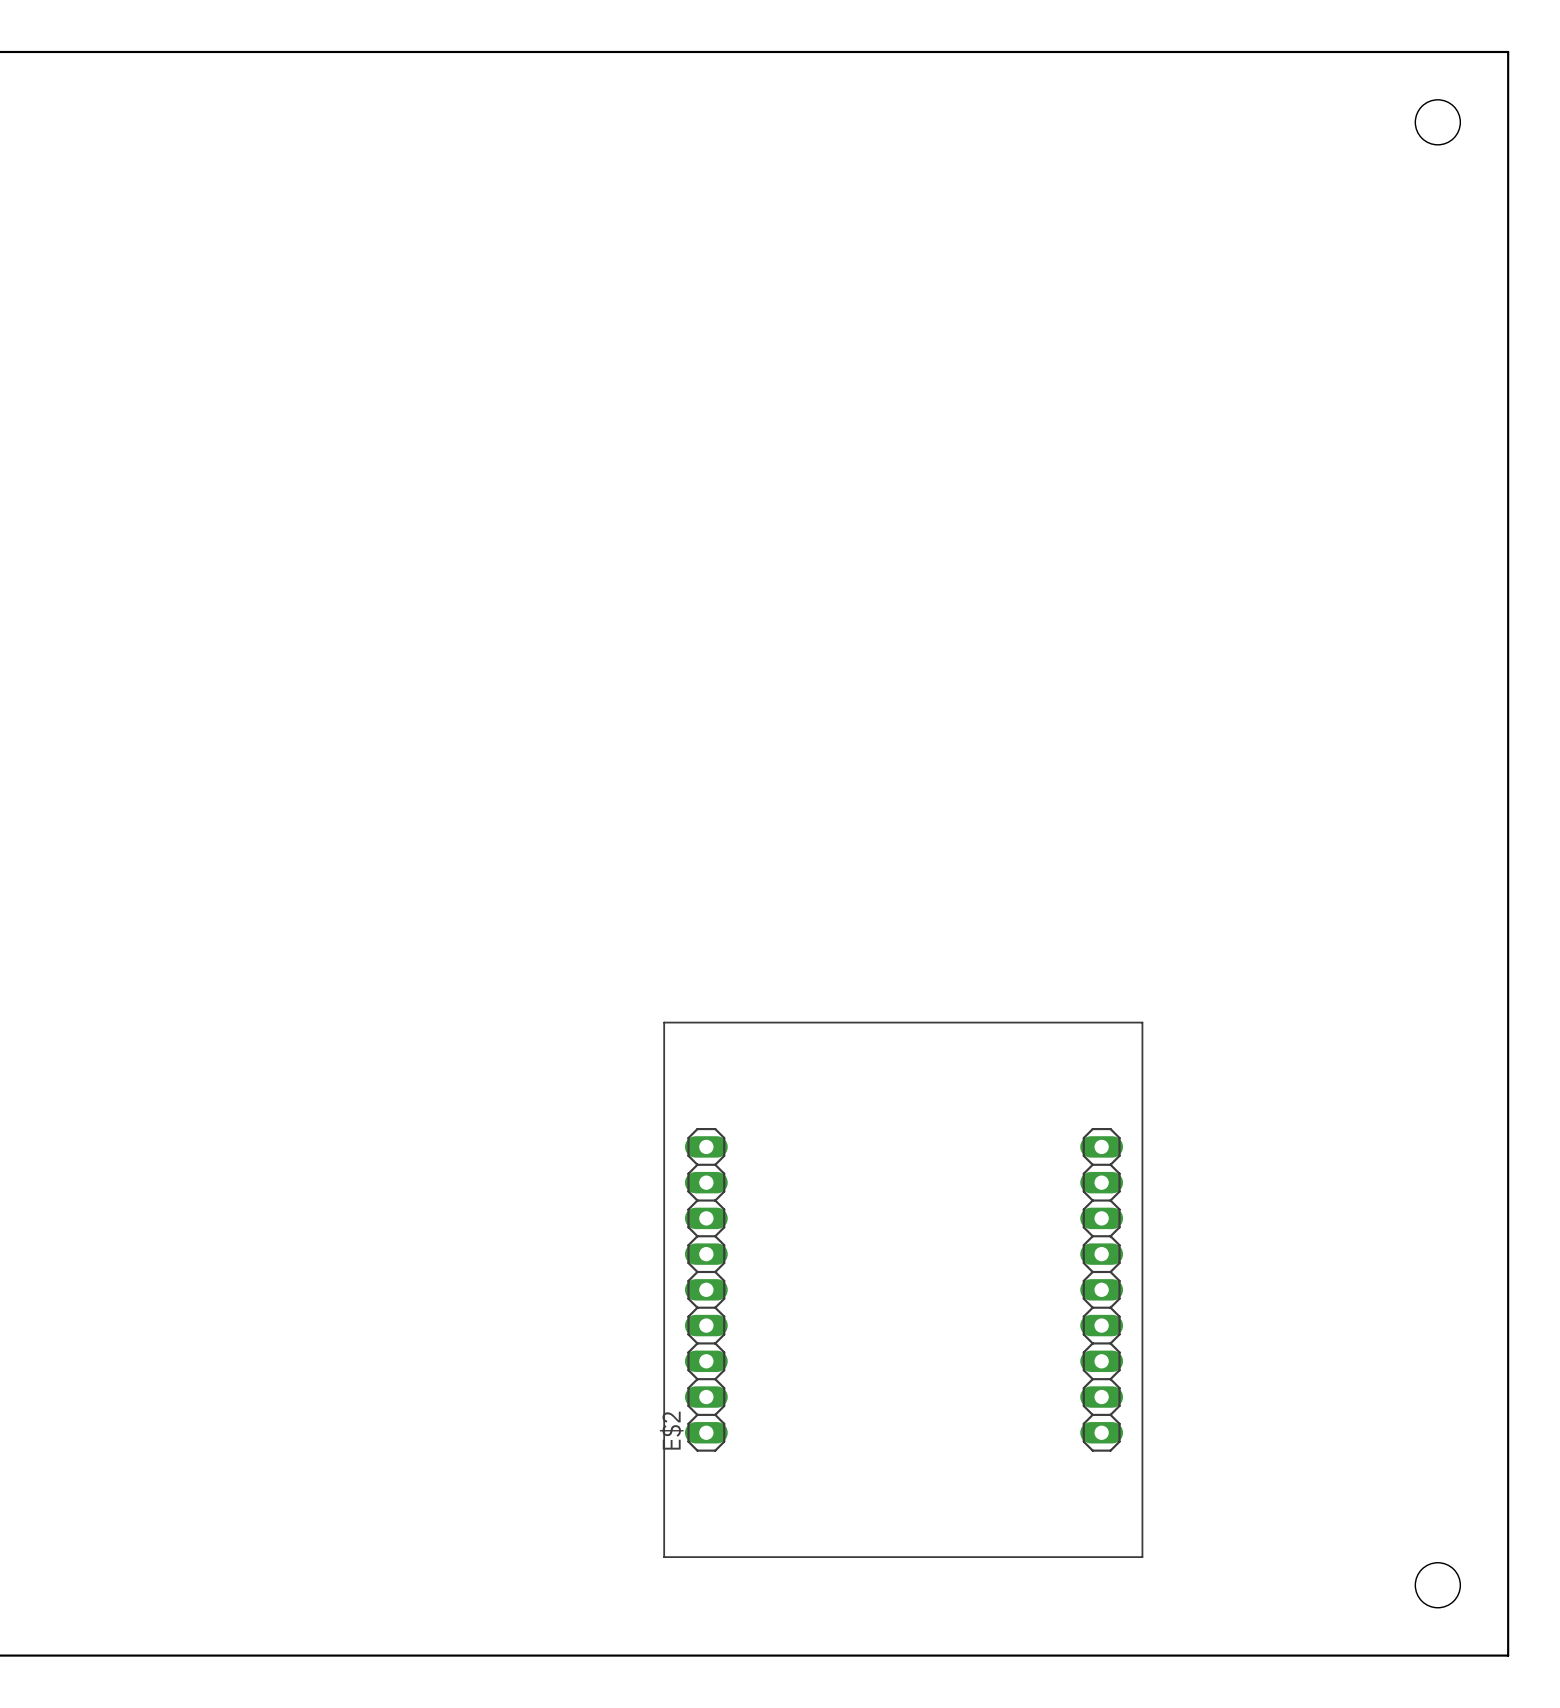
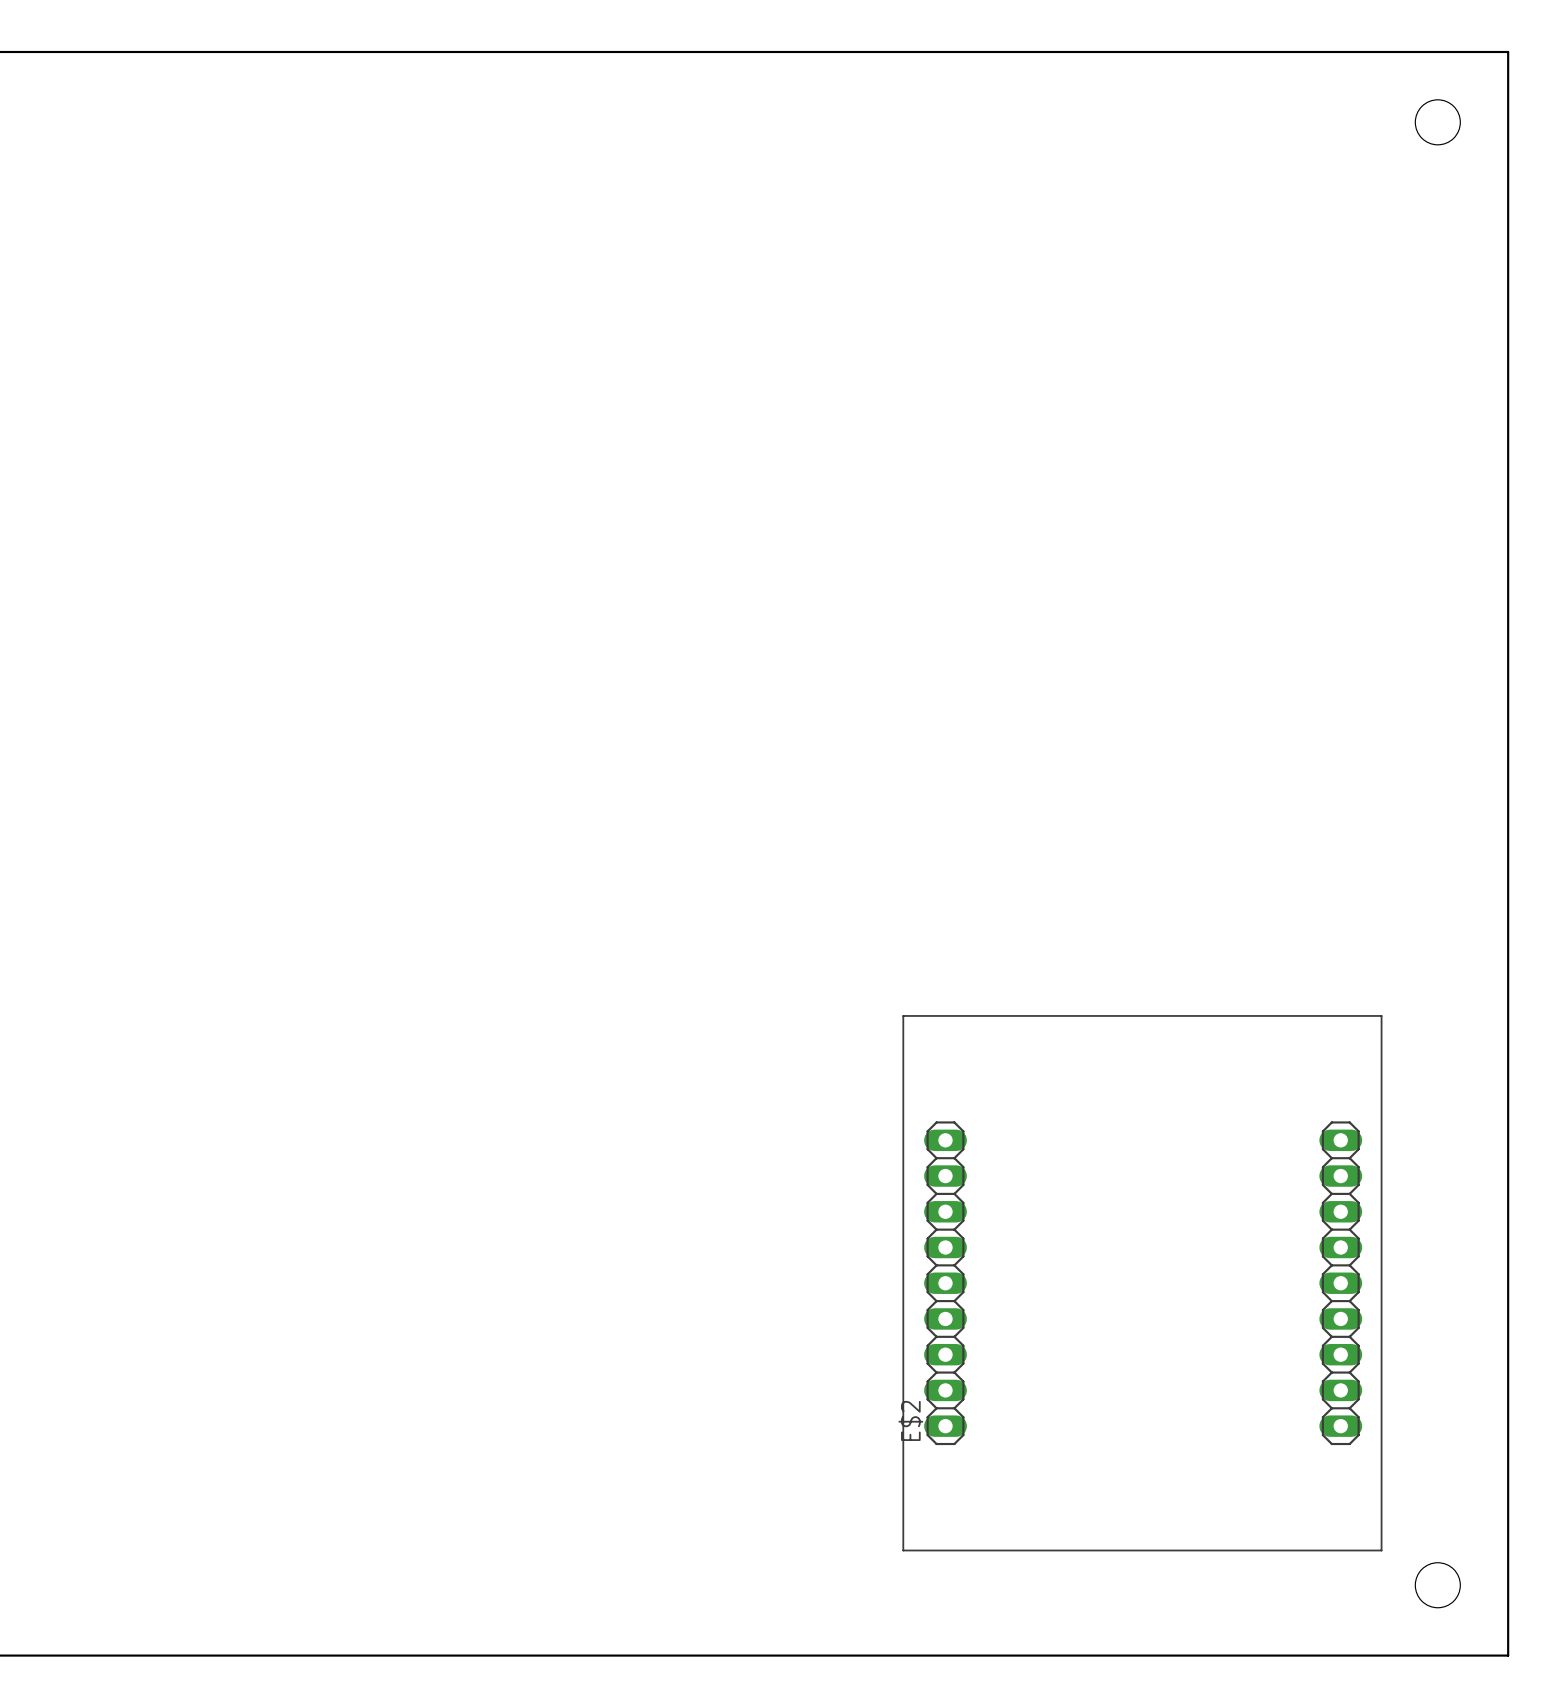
E$2 position: (903, 1289) -> (1142, 1283)

